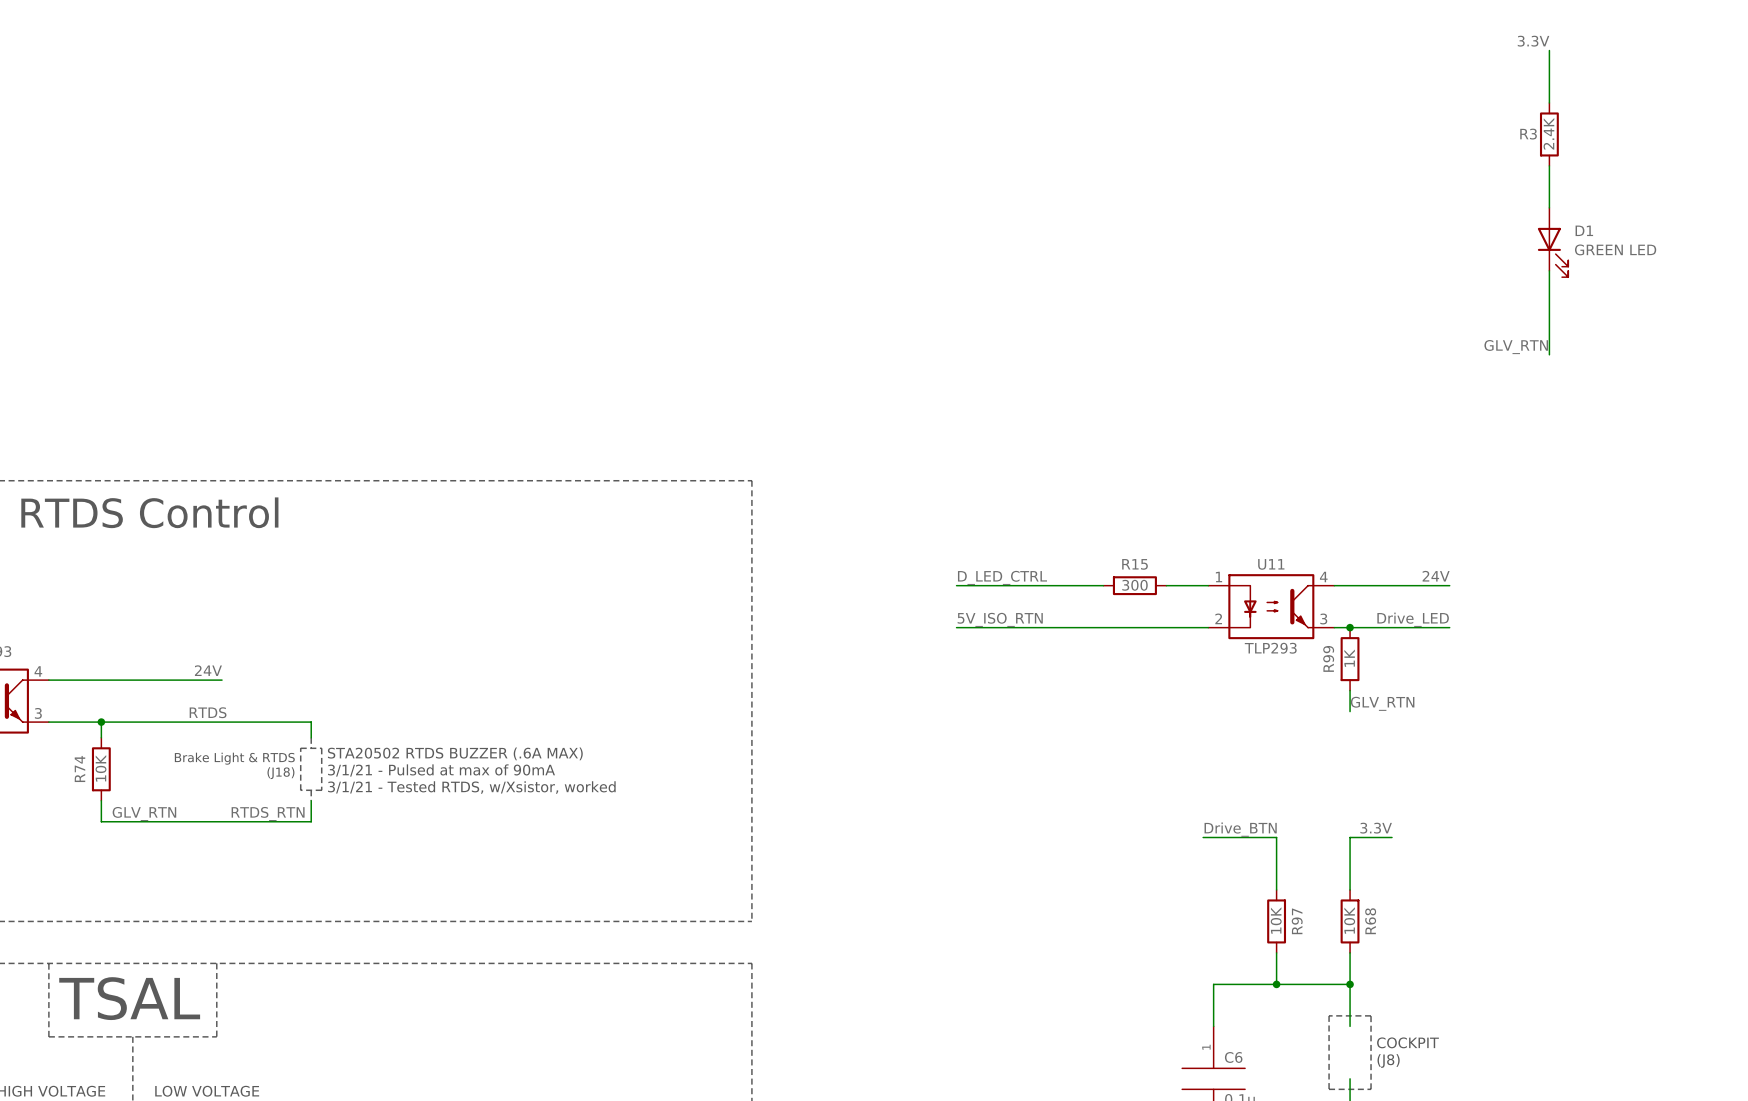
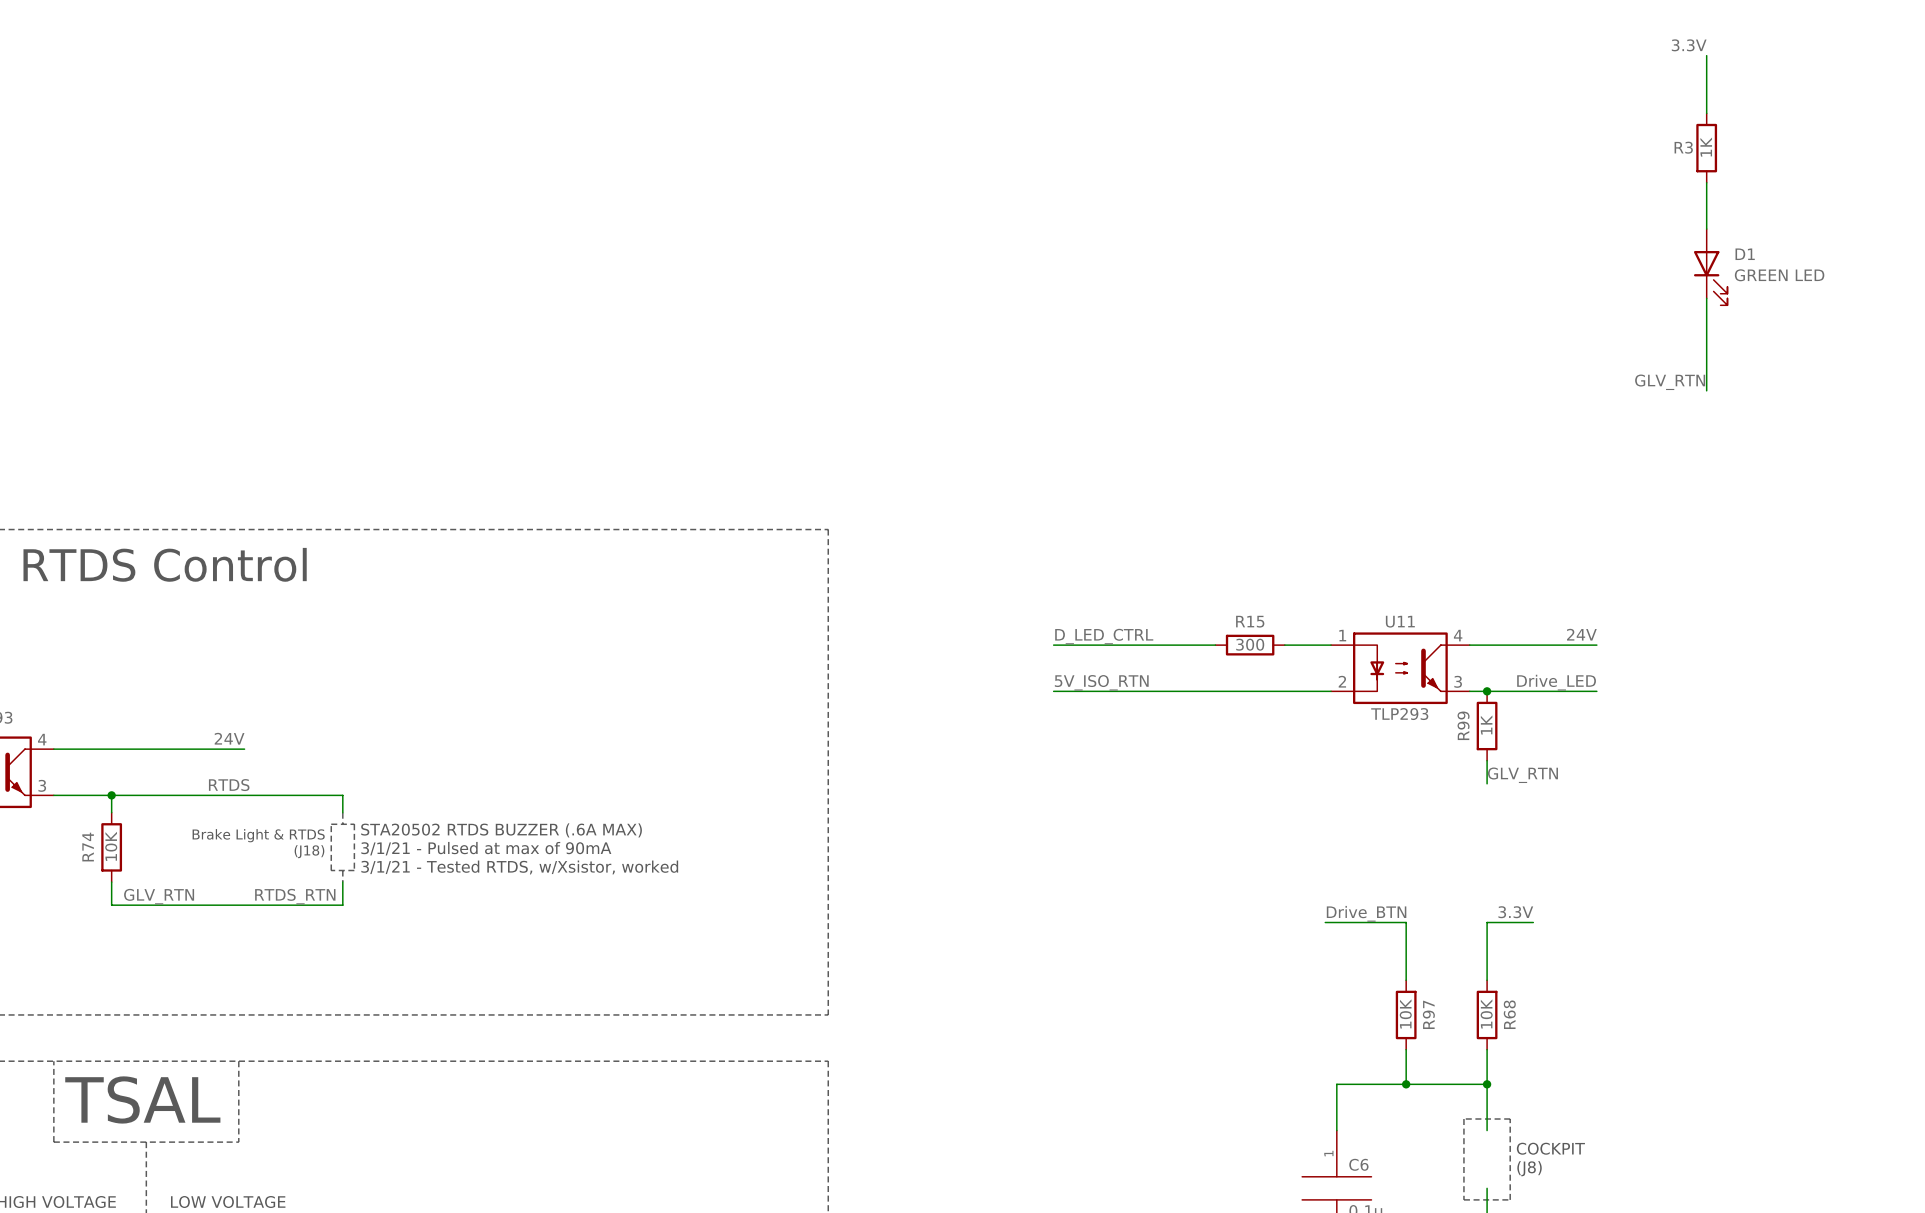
R3 value: 2.4K (1548, 133) -> 1K (1706, 147)

